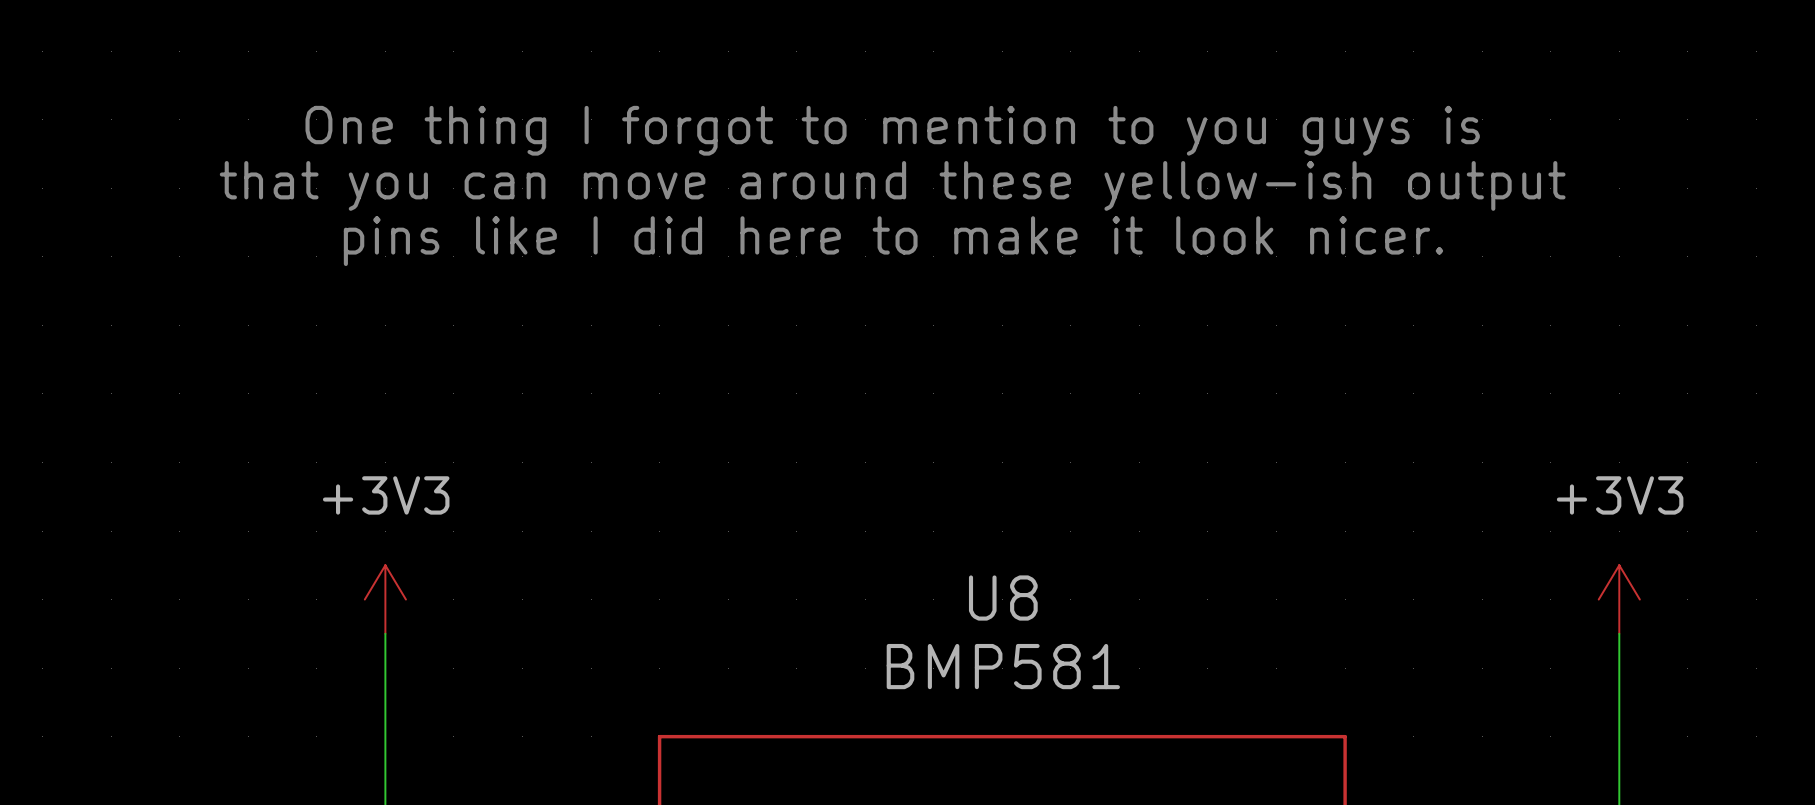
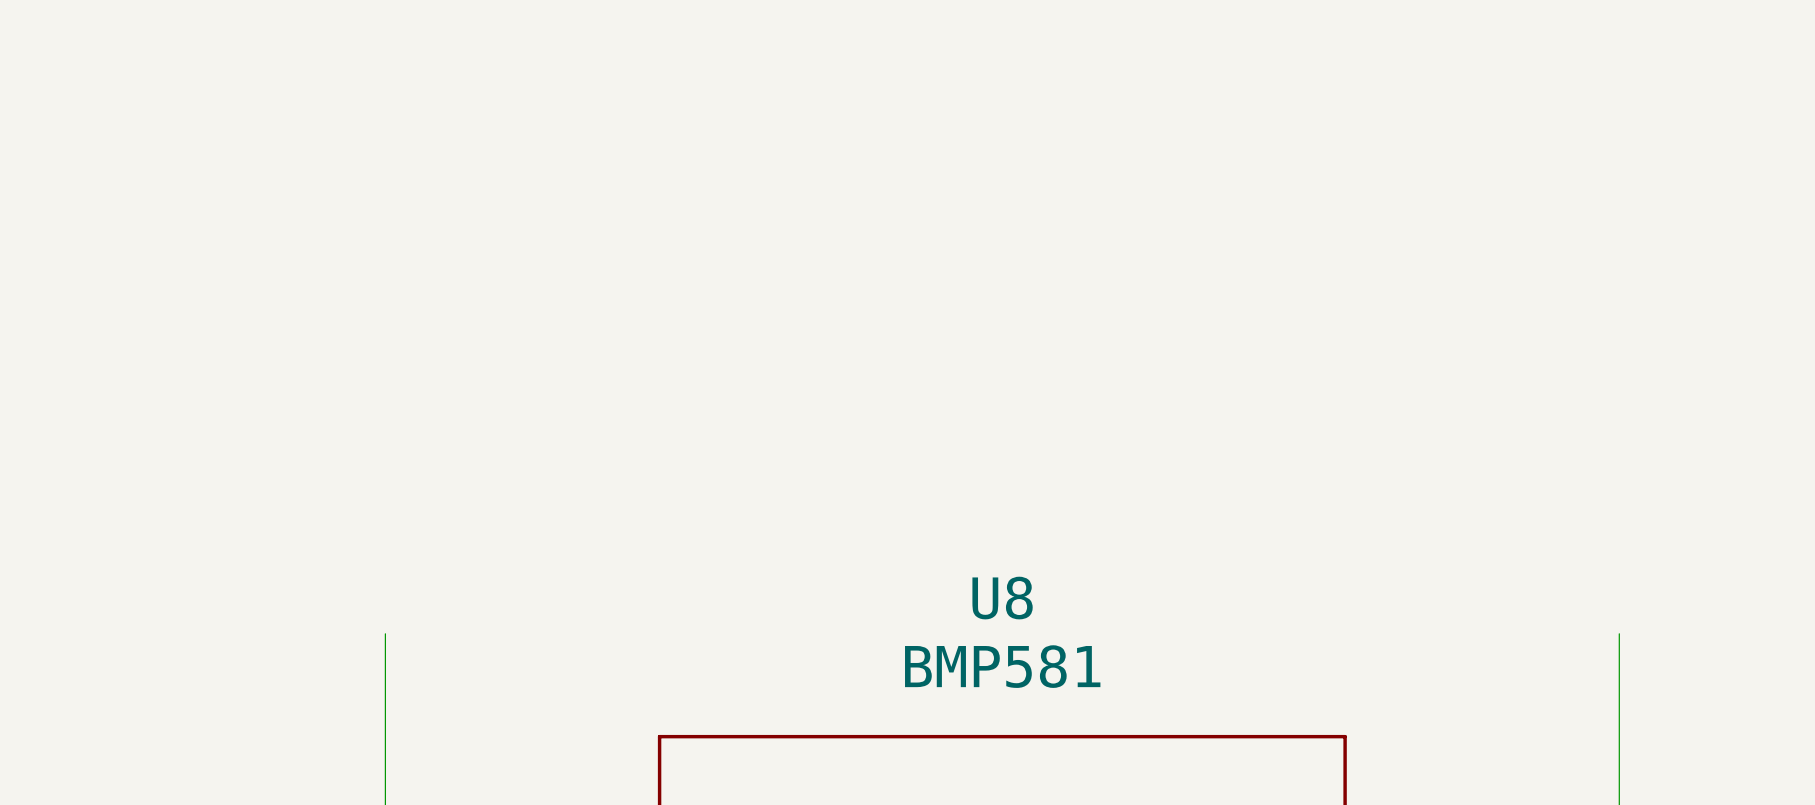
text: One thing I forgot to mention to you guys is (892, 130) -> none
text: that you can move around these yellow-ish output (892, 185) -> none
text: pins like I did here to make it look nicer. (893, 241) -> none
power symbol: +3V3 (385, 599) -> none
power symbol: +3V3 (1619, 599) -> none

